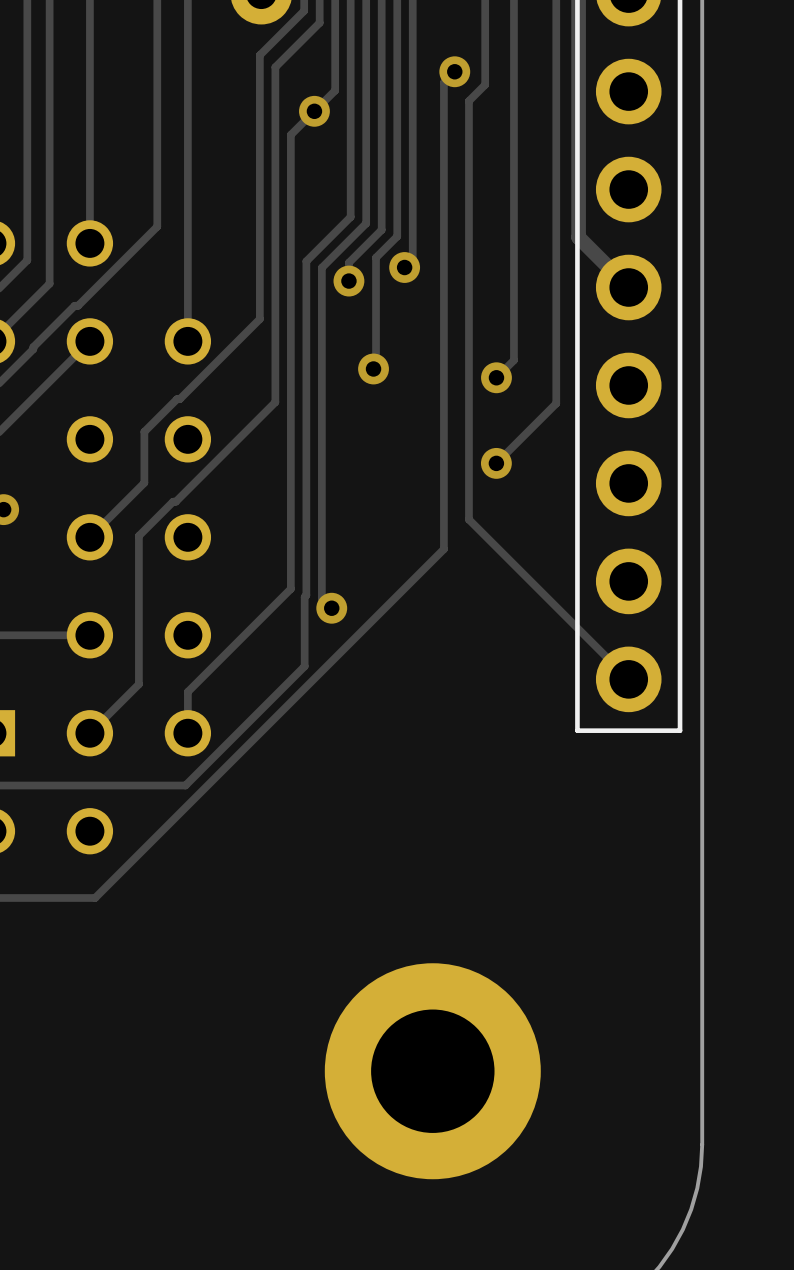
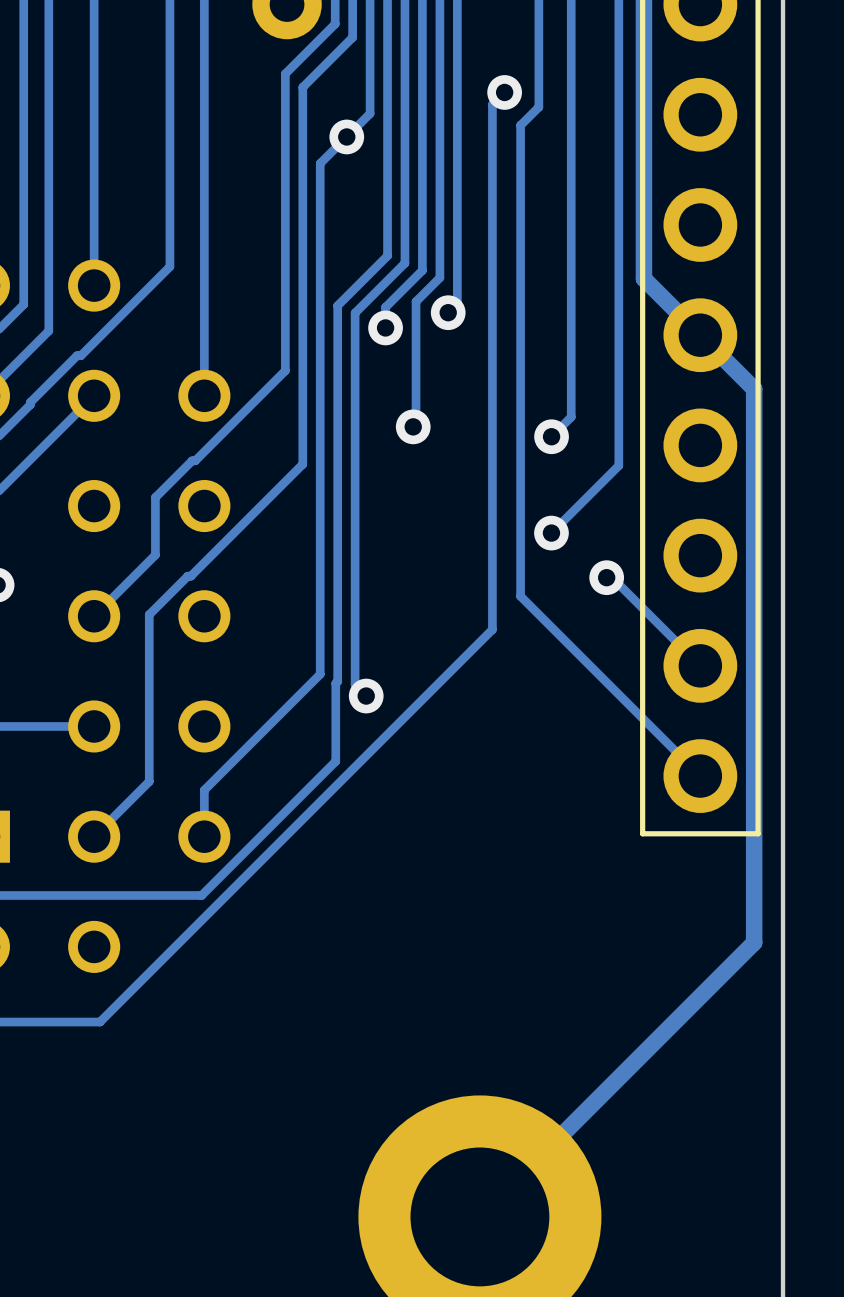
track: none -> (700, 335) (754, 389) (754, 942) (479, 1216)
track: none -> (606, 577) (612, 577) (700, 665)
via: none -> (606, 577)

